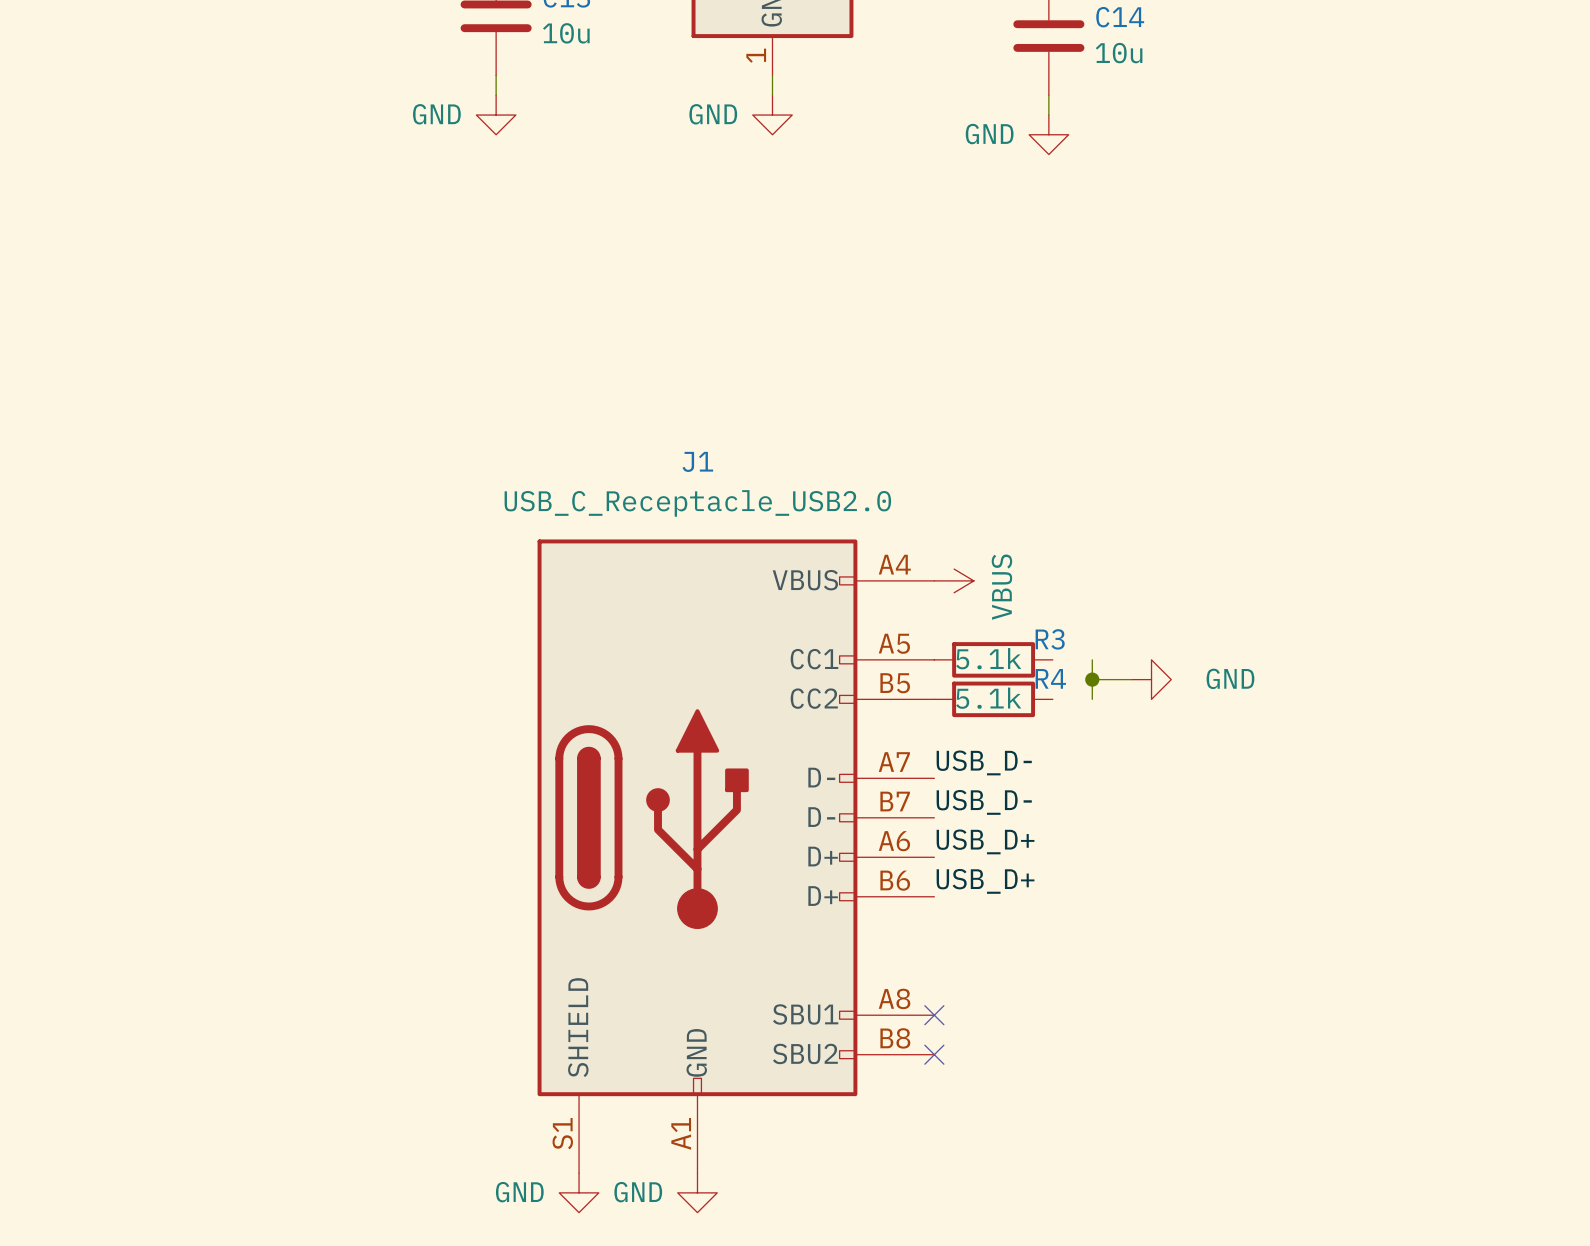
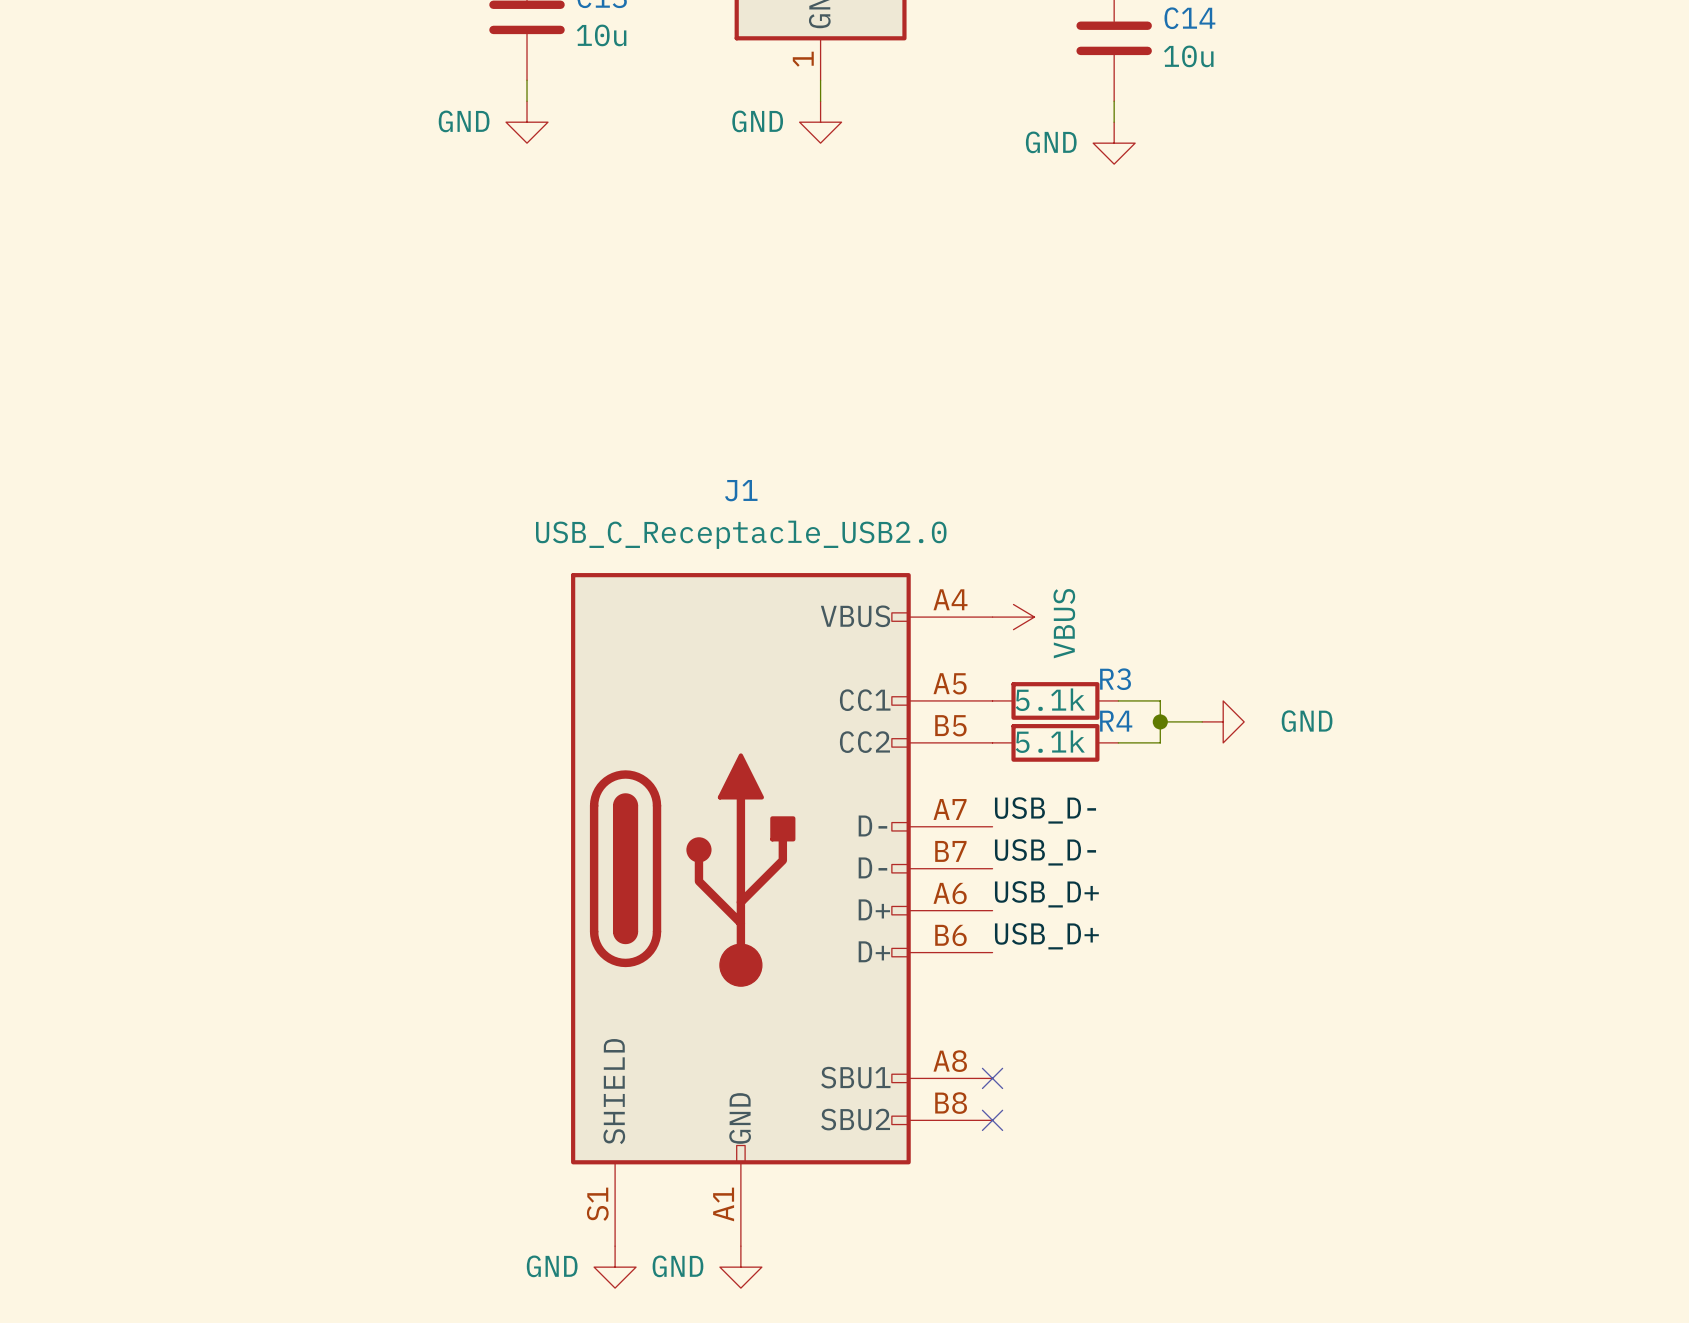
wire: none -> (1118, 700) (1160, 700)
wire: none -> (1118, 742) (1160, 742)

